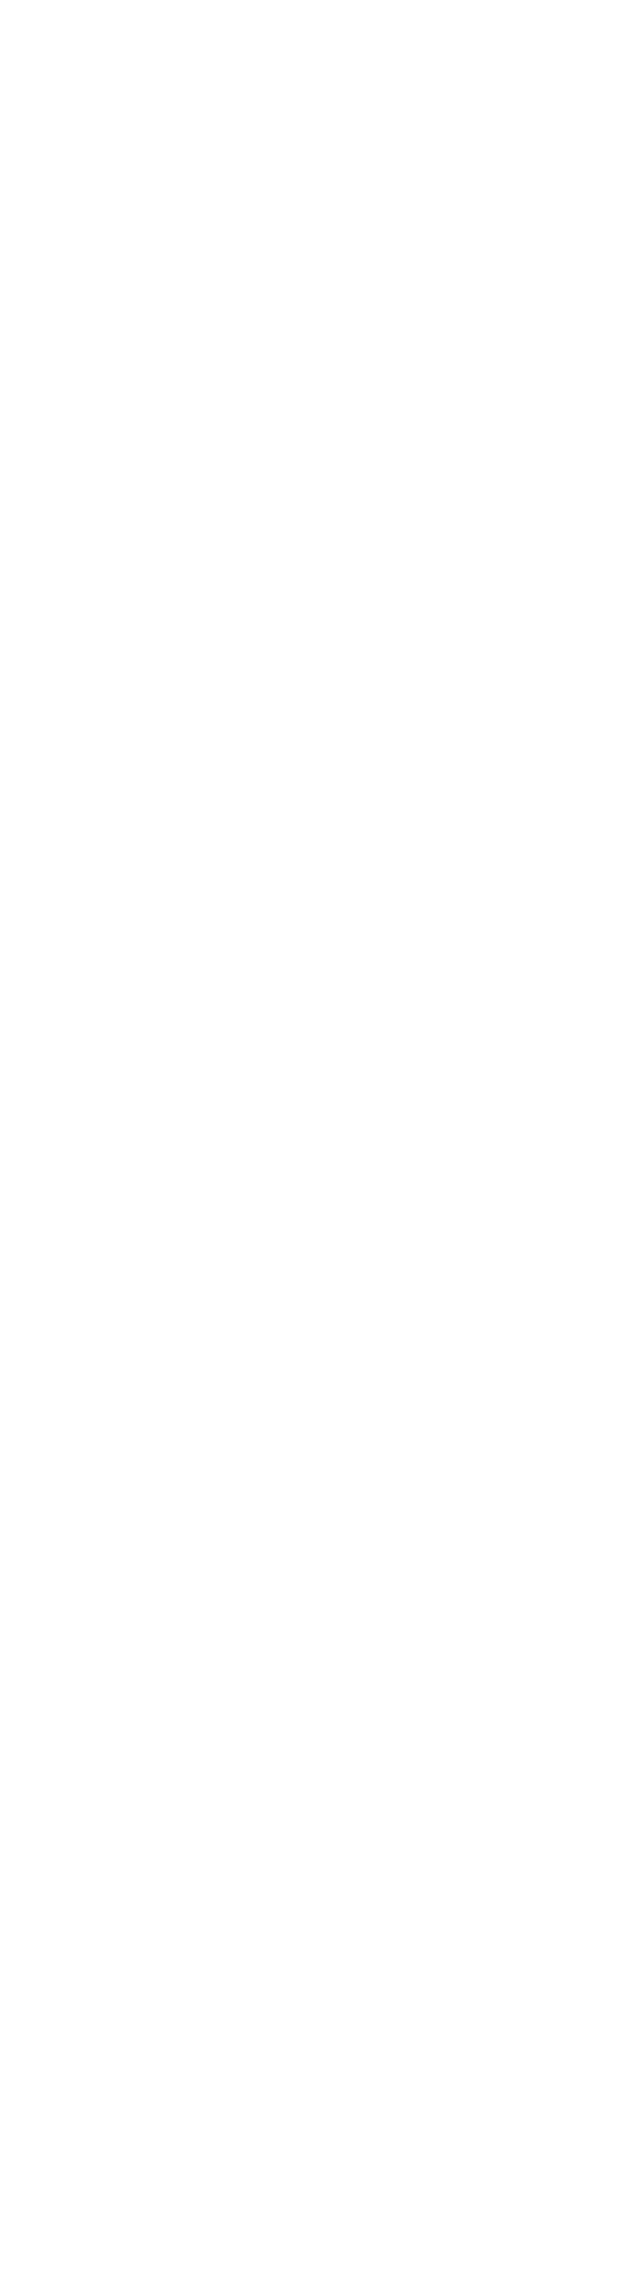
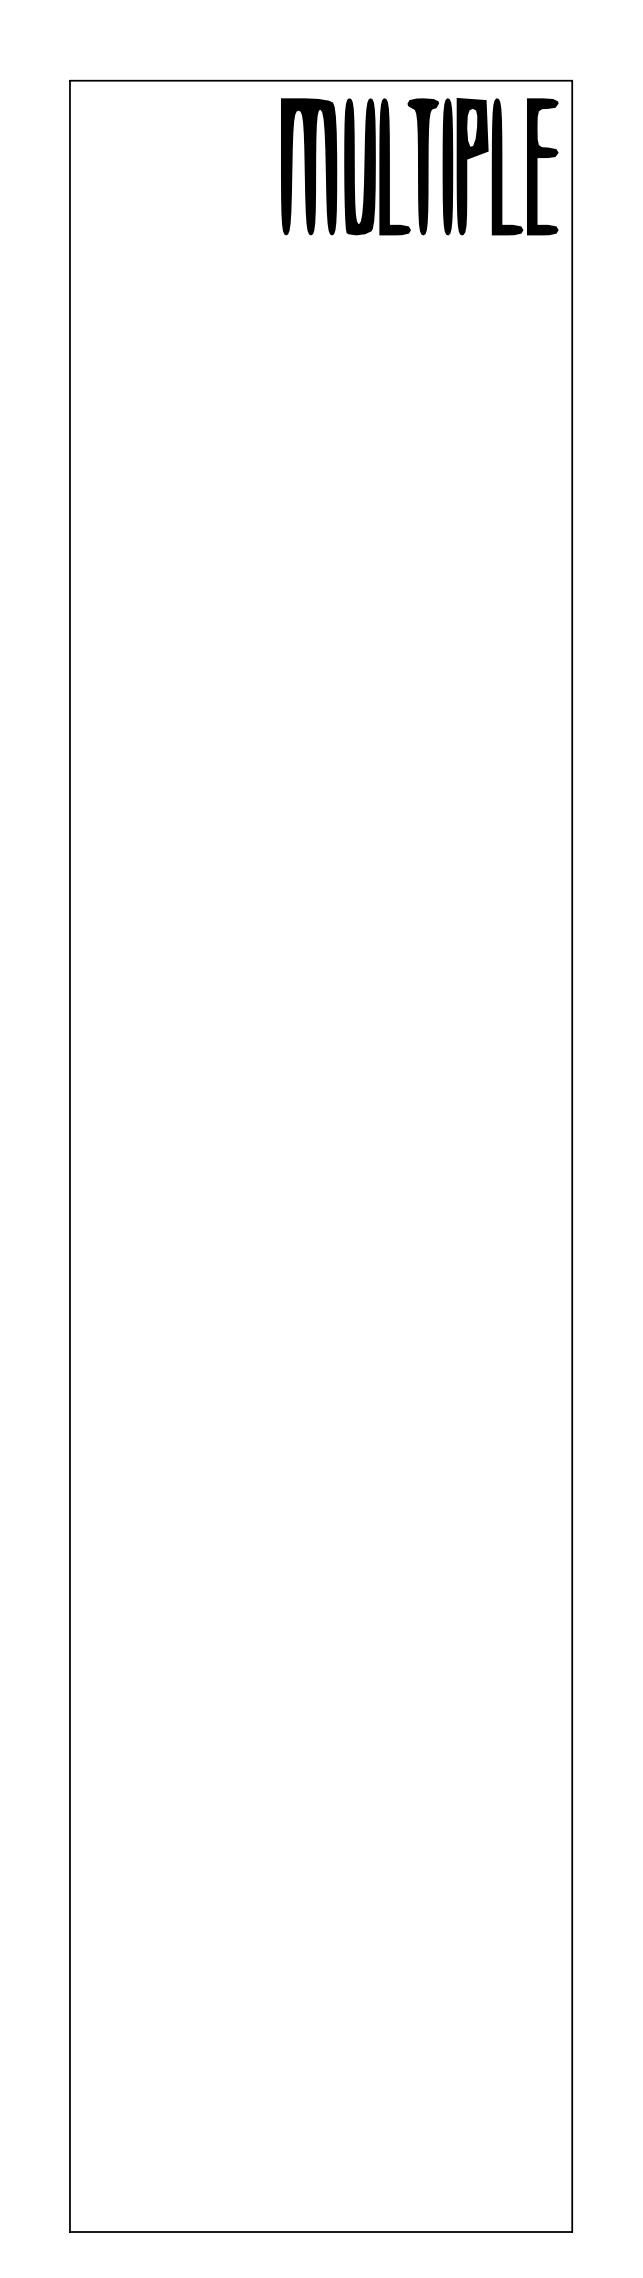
board edge: none -> (69, 80) (572, 80) (572, 2232) (69, 2232) (69, 80)
drawing: none -> [280, 97, 559, 236]

